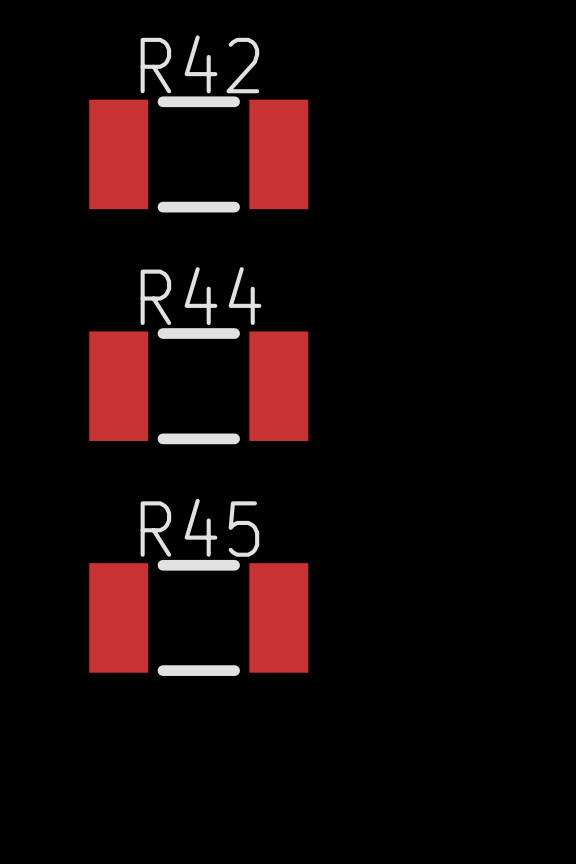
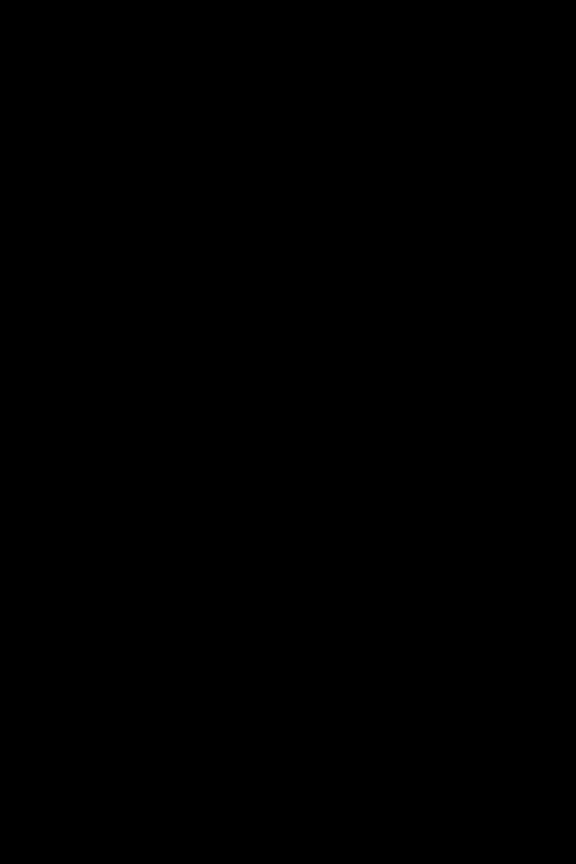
R42: (198, 154) -> none
R44: (198, 386) -> none
R45: (198, 617) -> none

